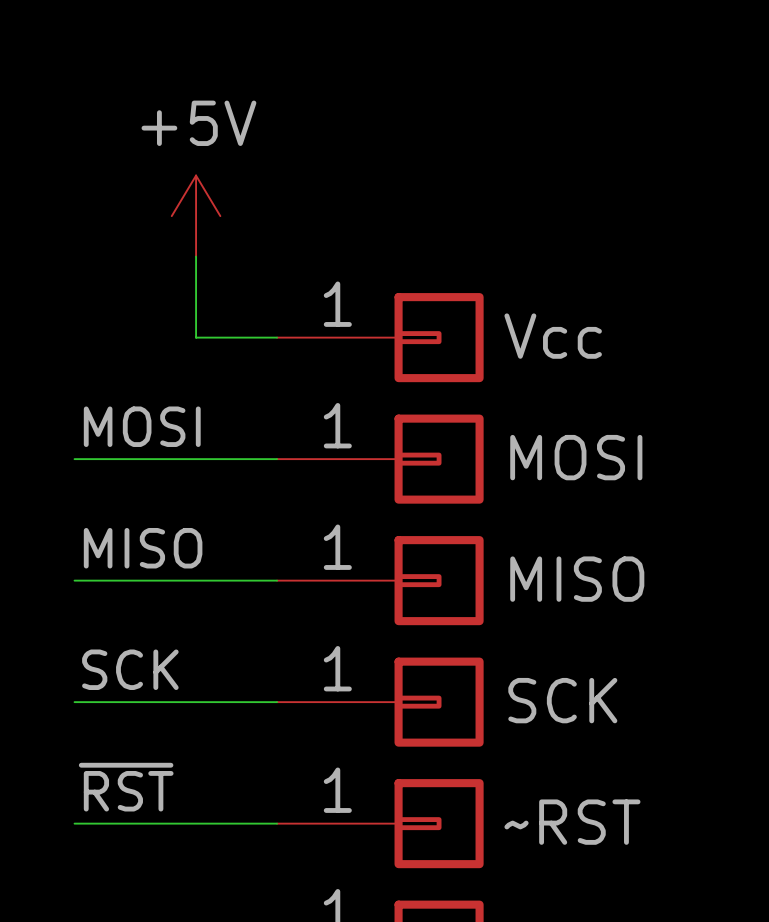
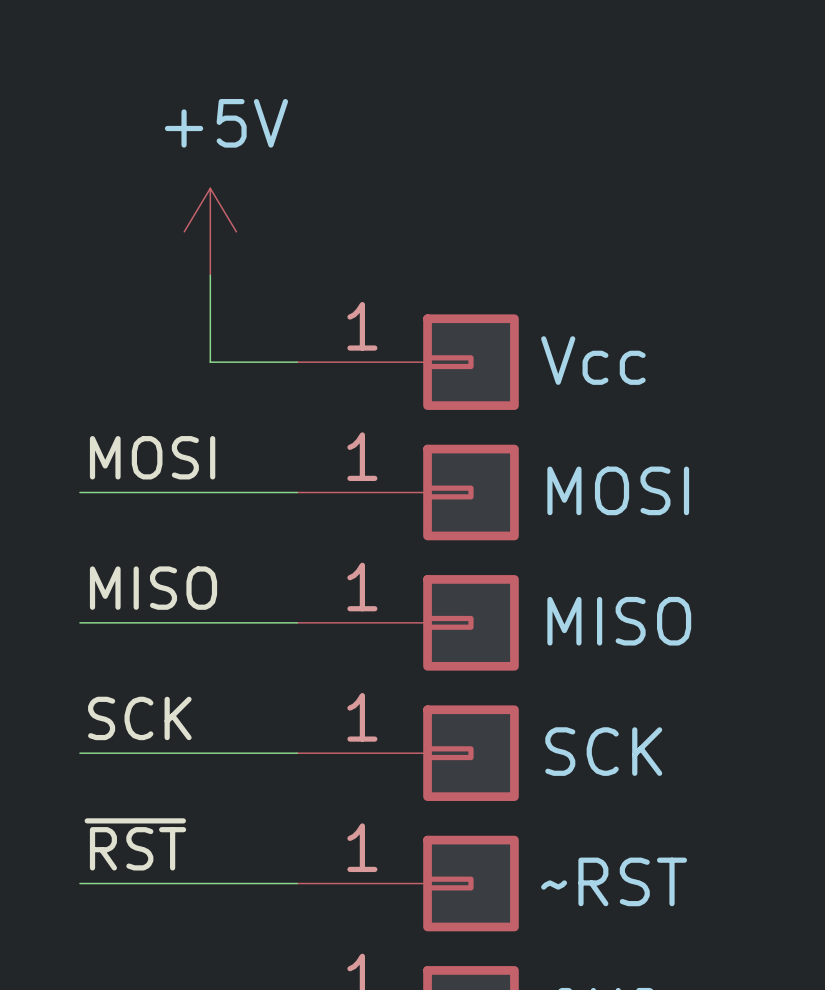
power symbol text position: +5V (198, 123) -> +5V (226, 123)

